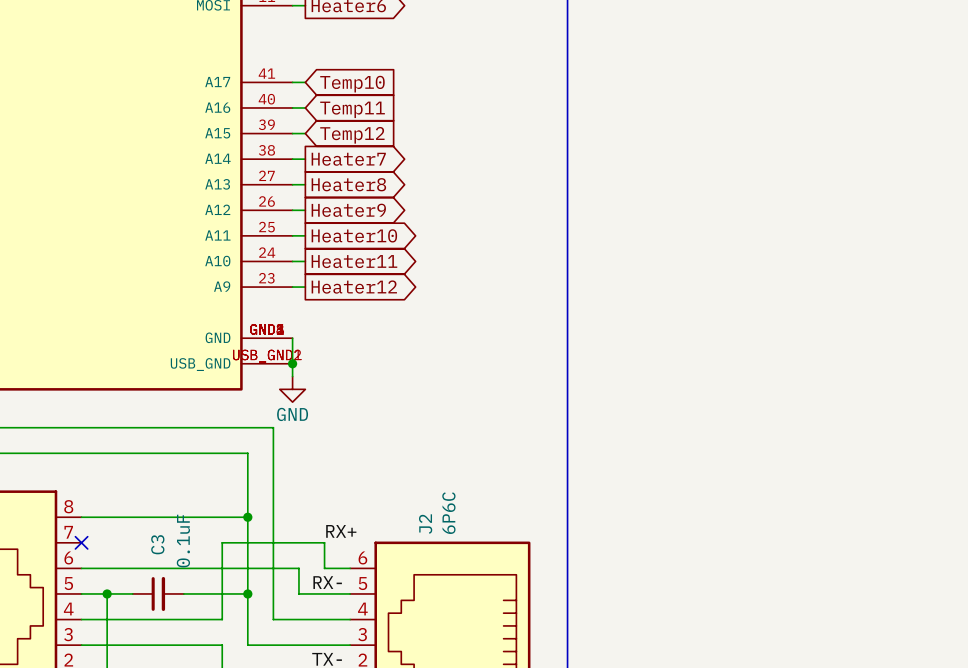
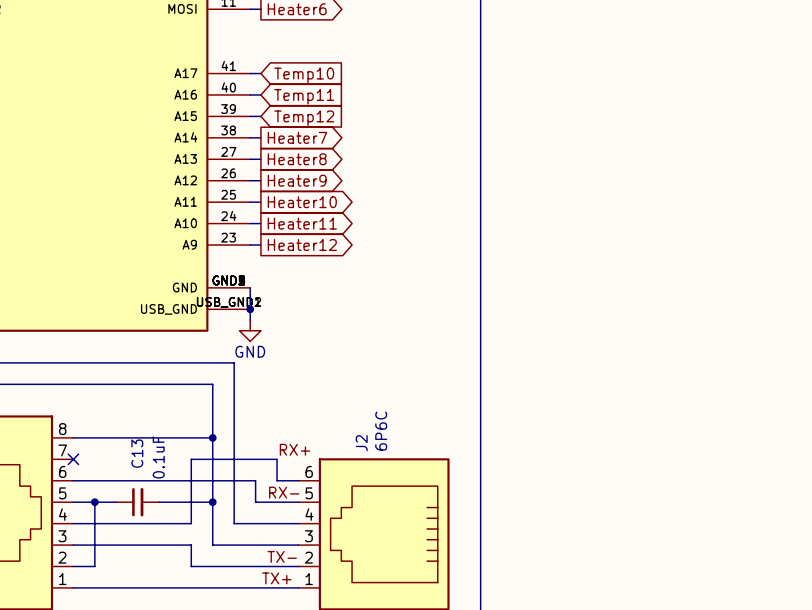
C3 name: C3 (157, 544) -> C13 (137, 453)

